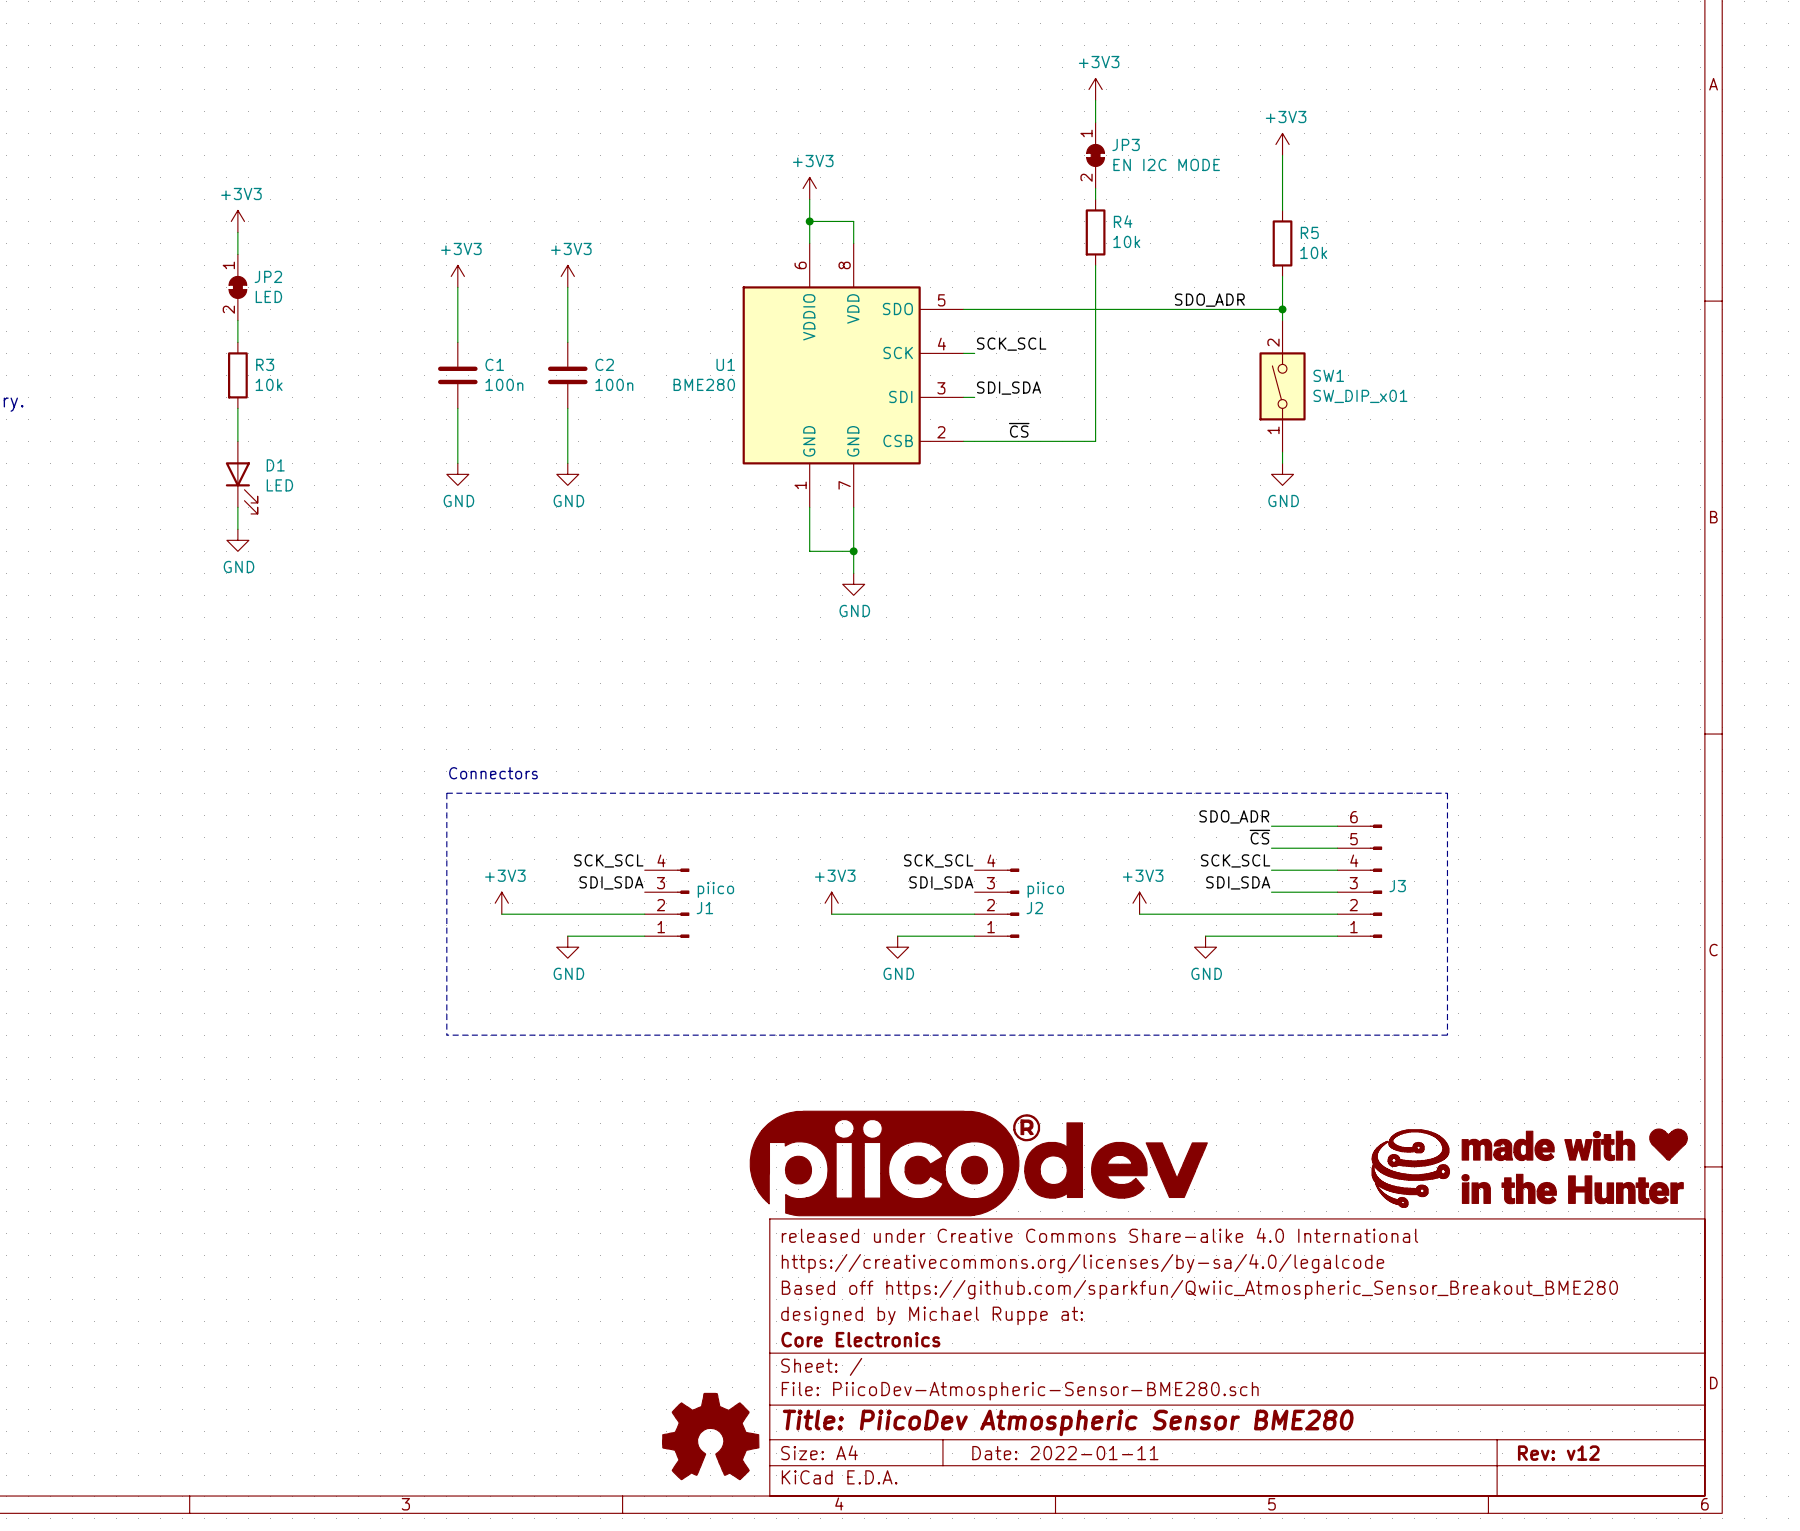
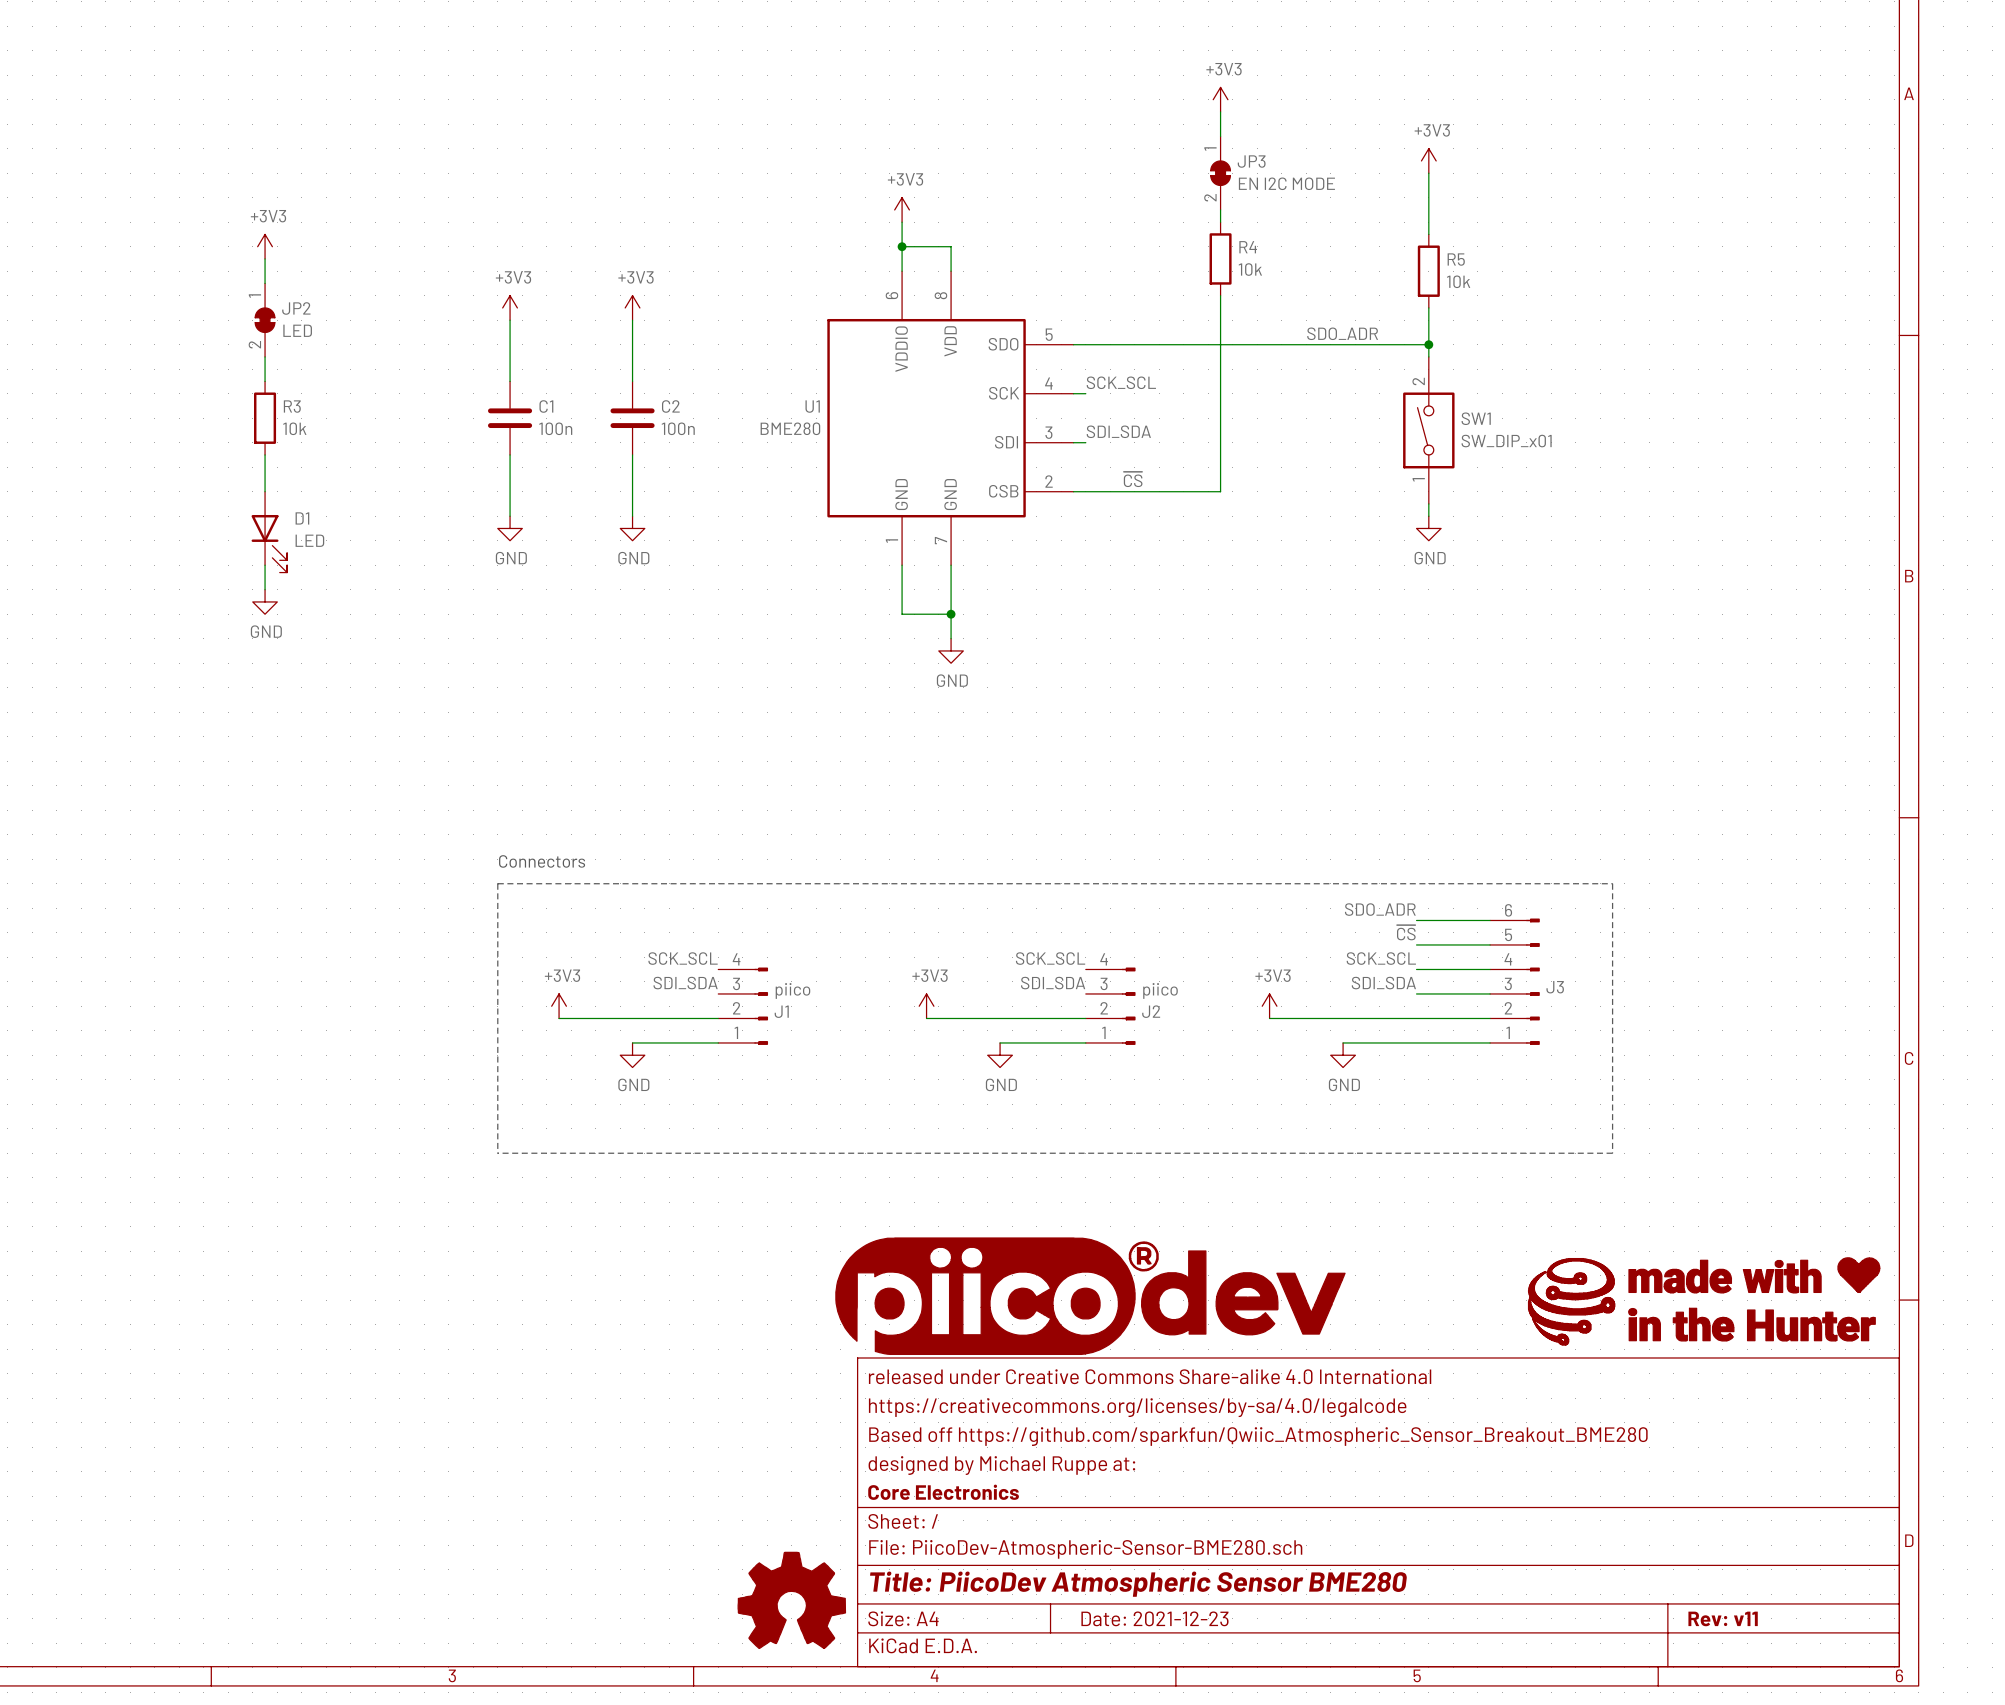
title block: Date: 2022-01-11 (1065, 1453) -> Date: 2021-12-23 (1154, 1618)
title block: Rev: v12 (1558, 1453) -> Rev: v11 (1723, 1618)

